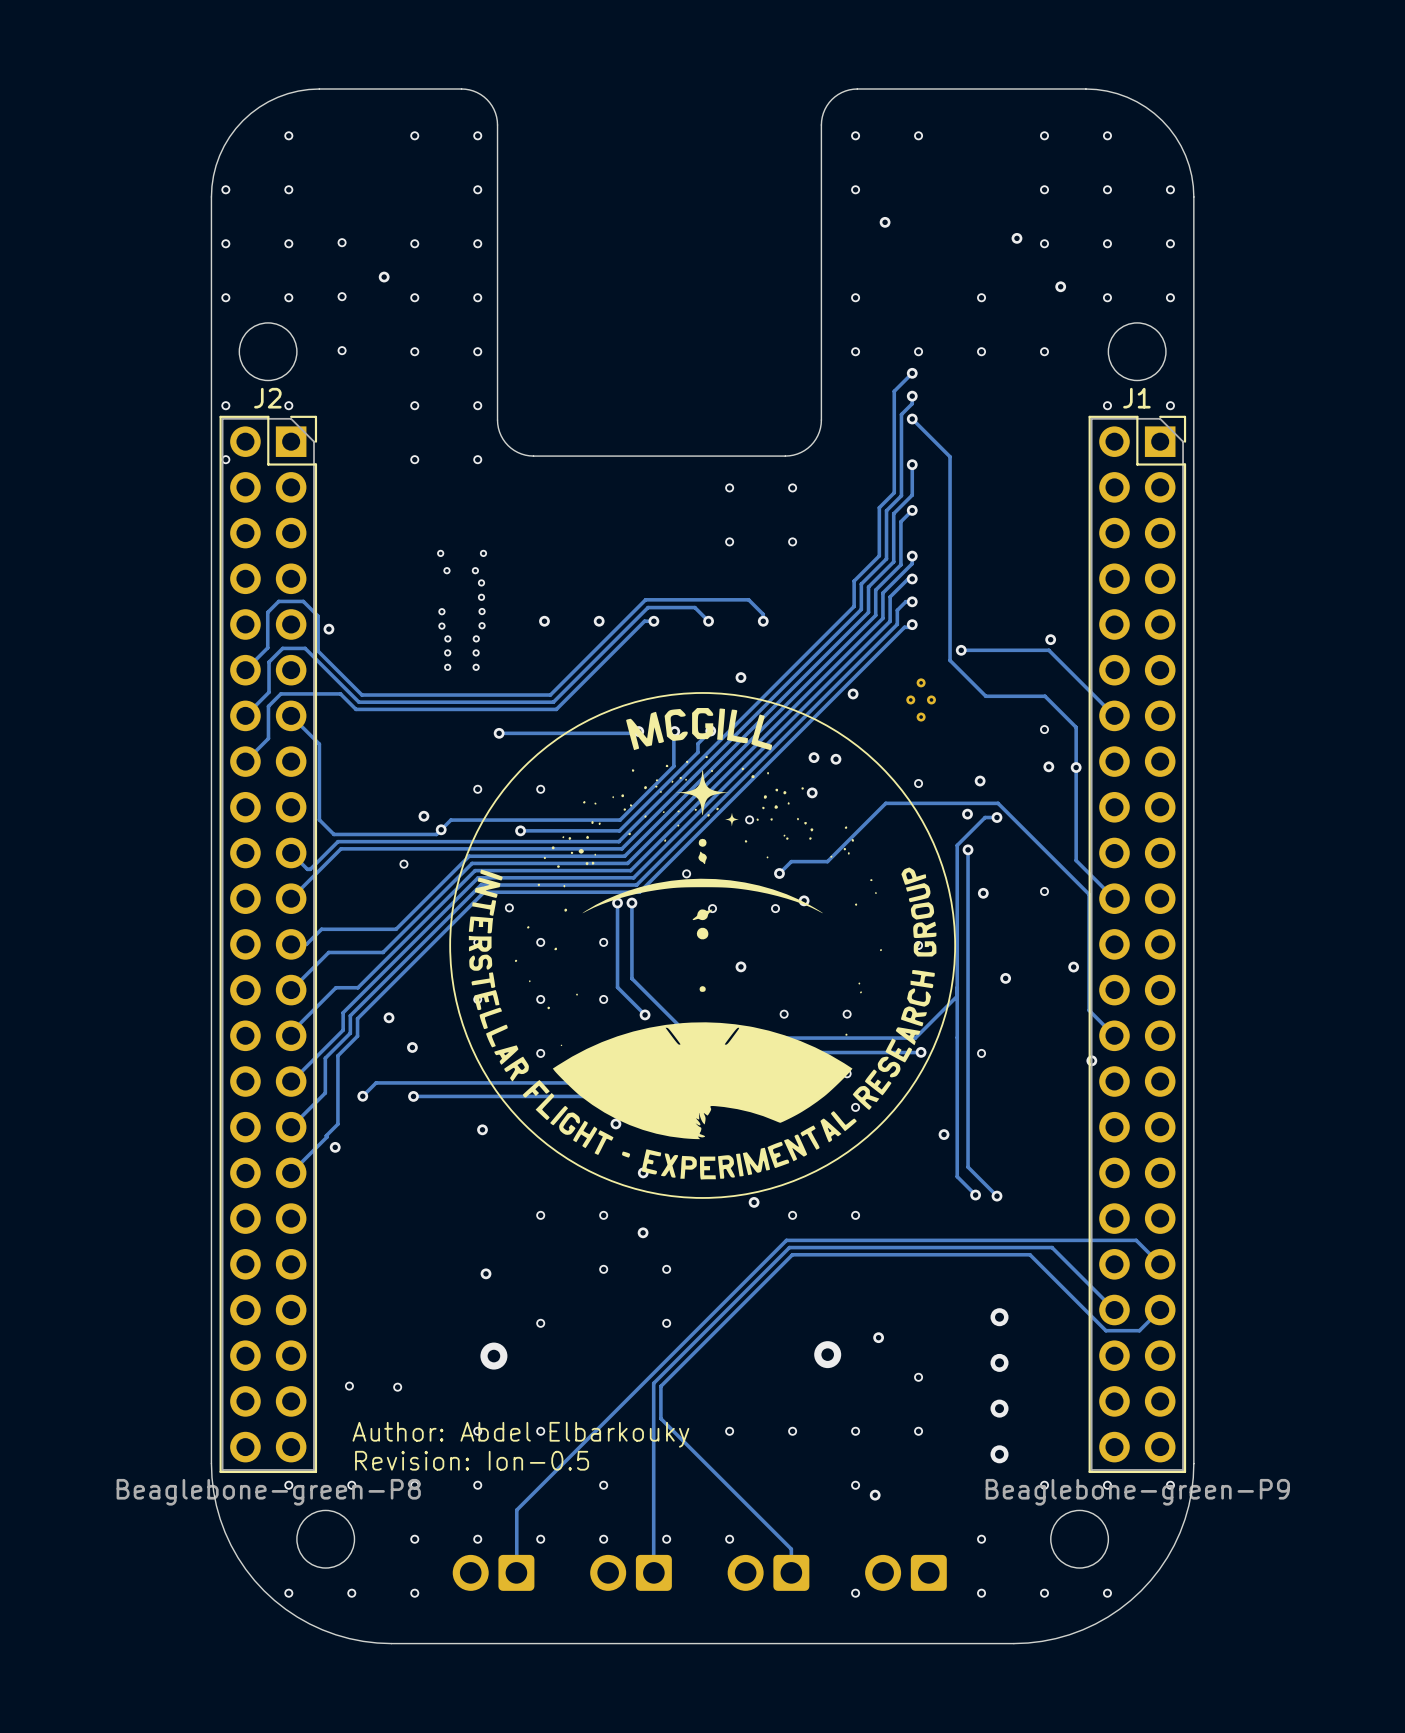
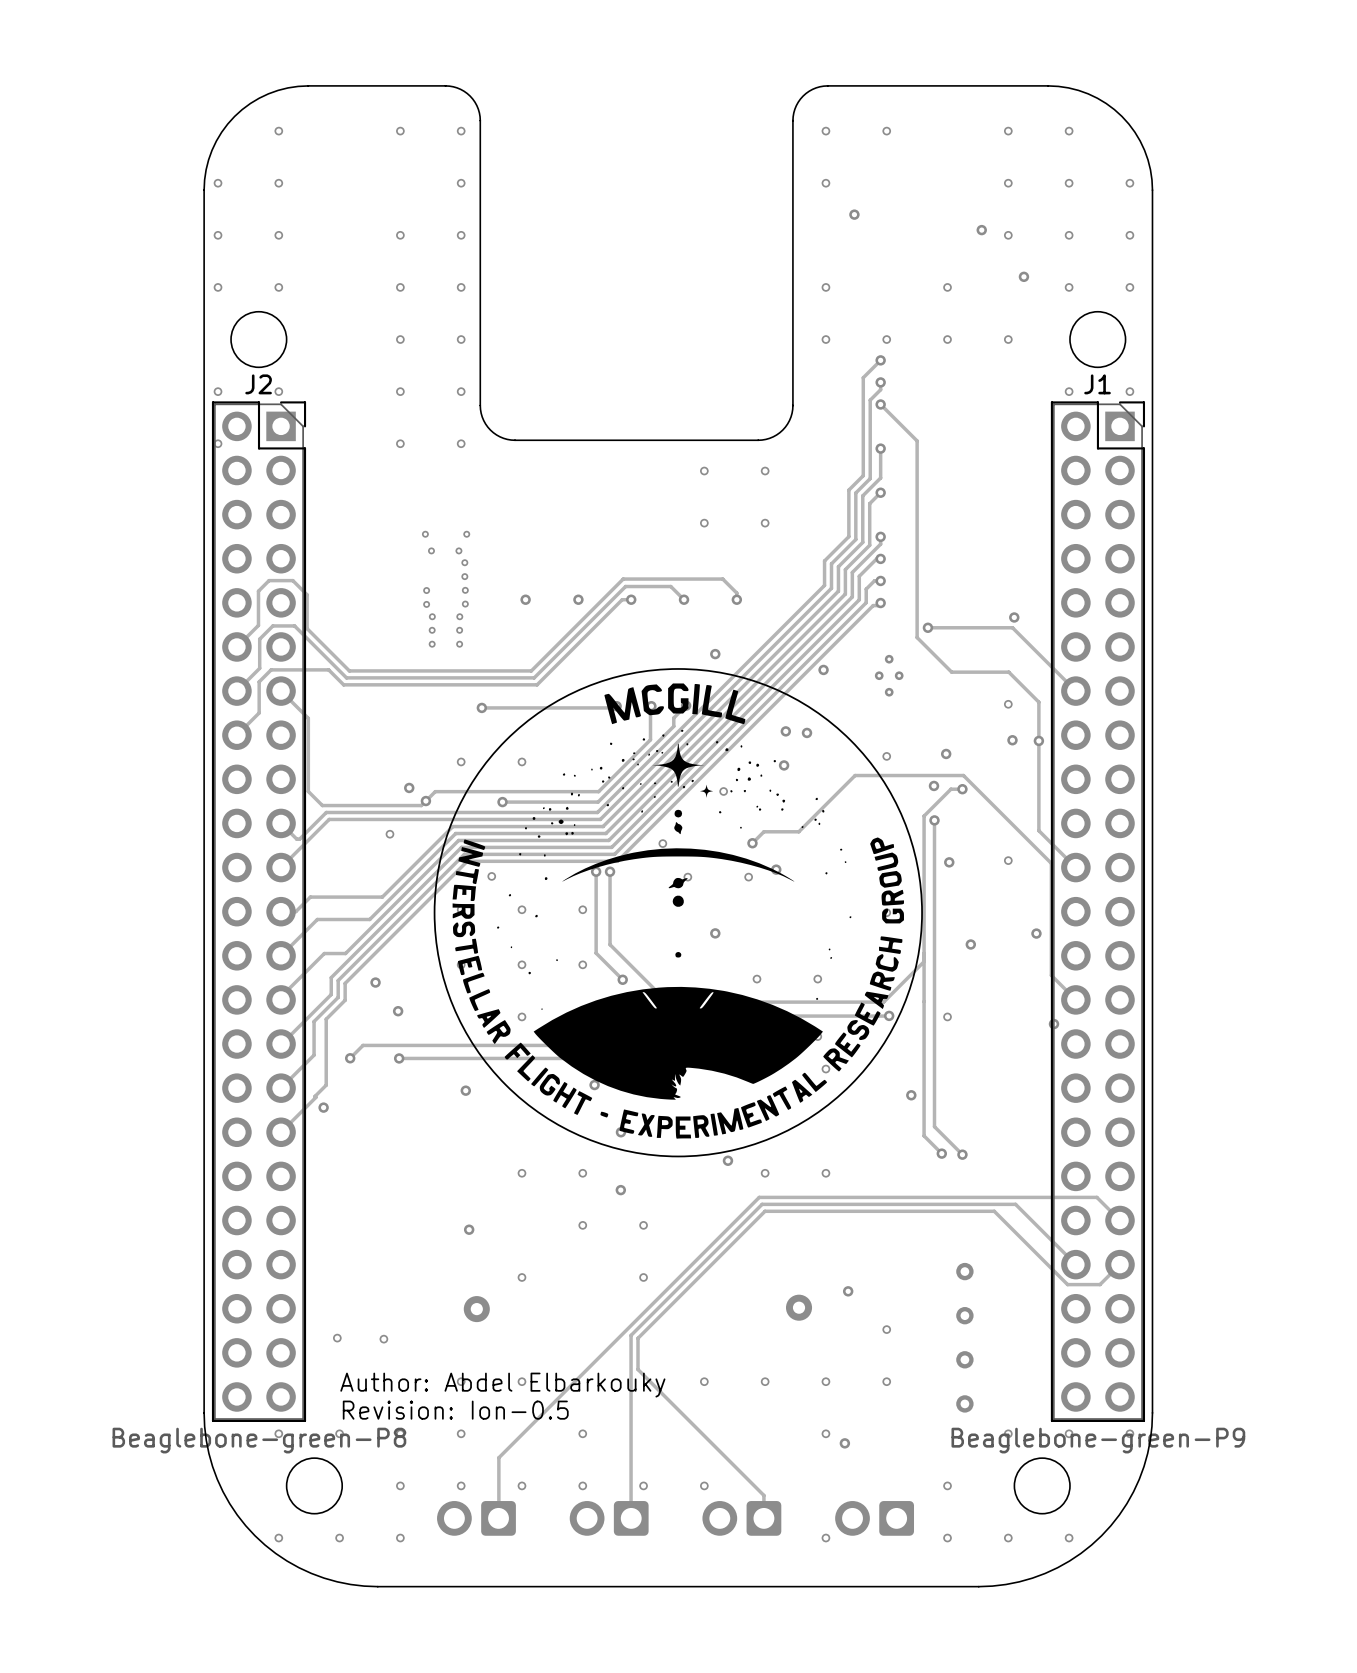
via: (342, 242) -> none
via: (384, 277) -> none
via: (342, 296) -> none
via: (342, 350) -> none
via: (328, 629) -> none

